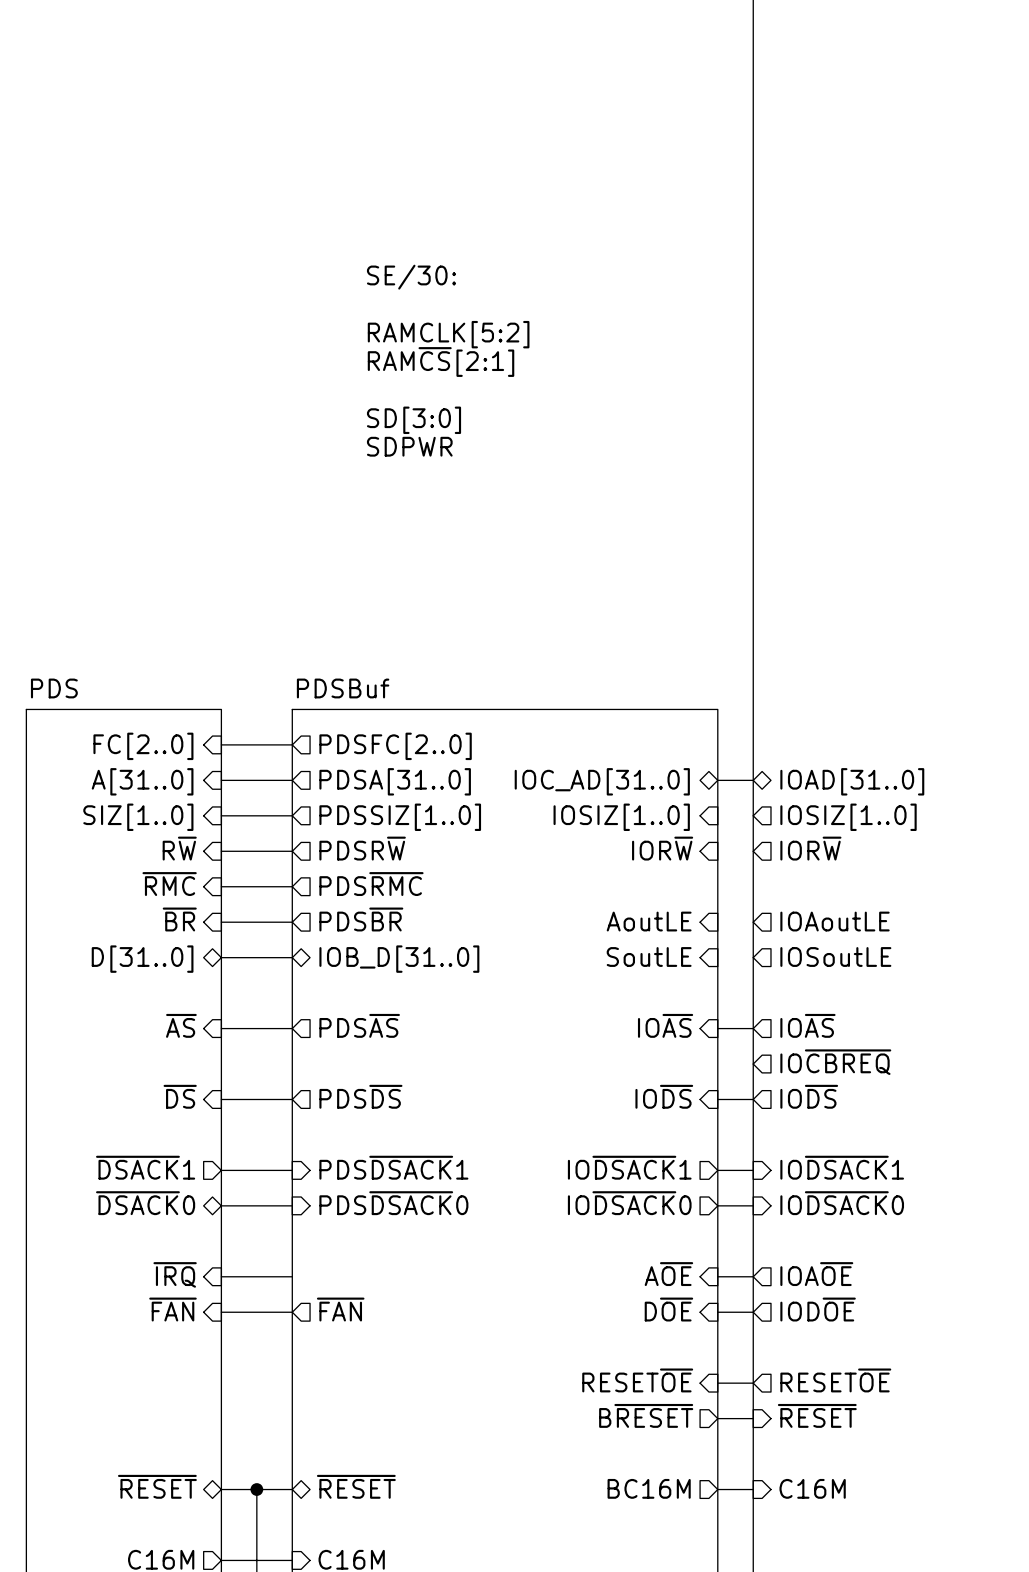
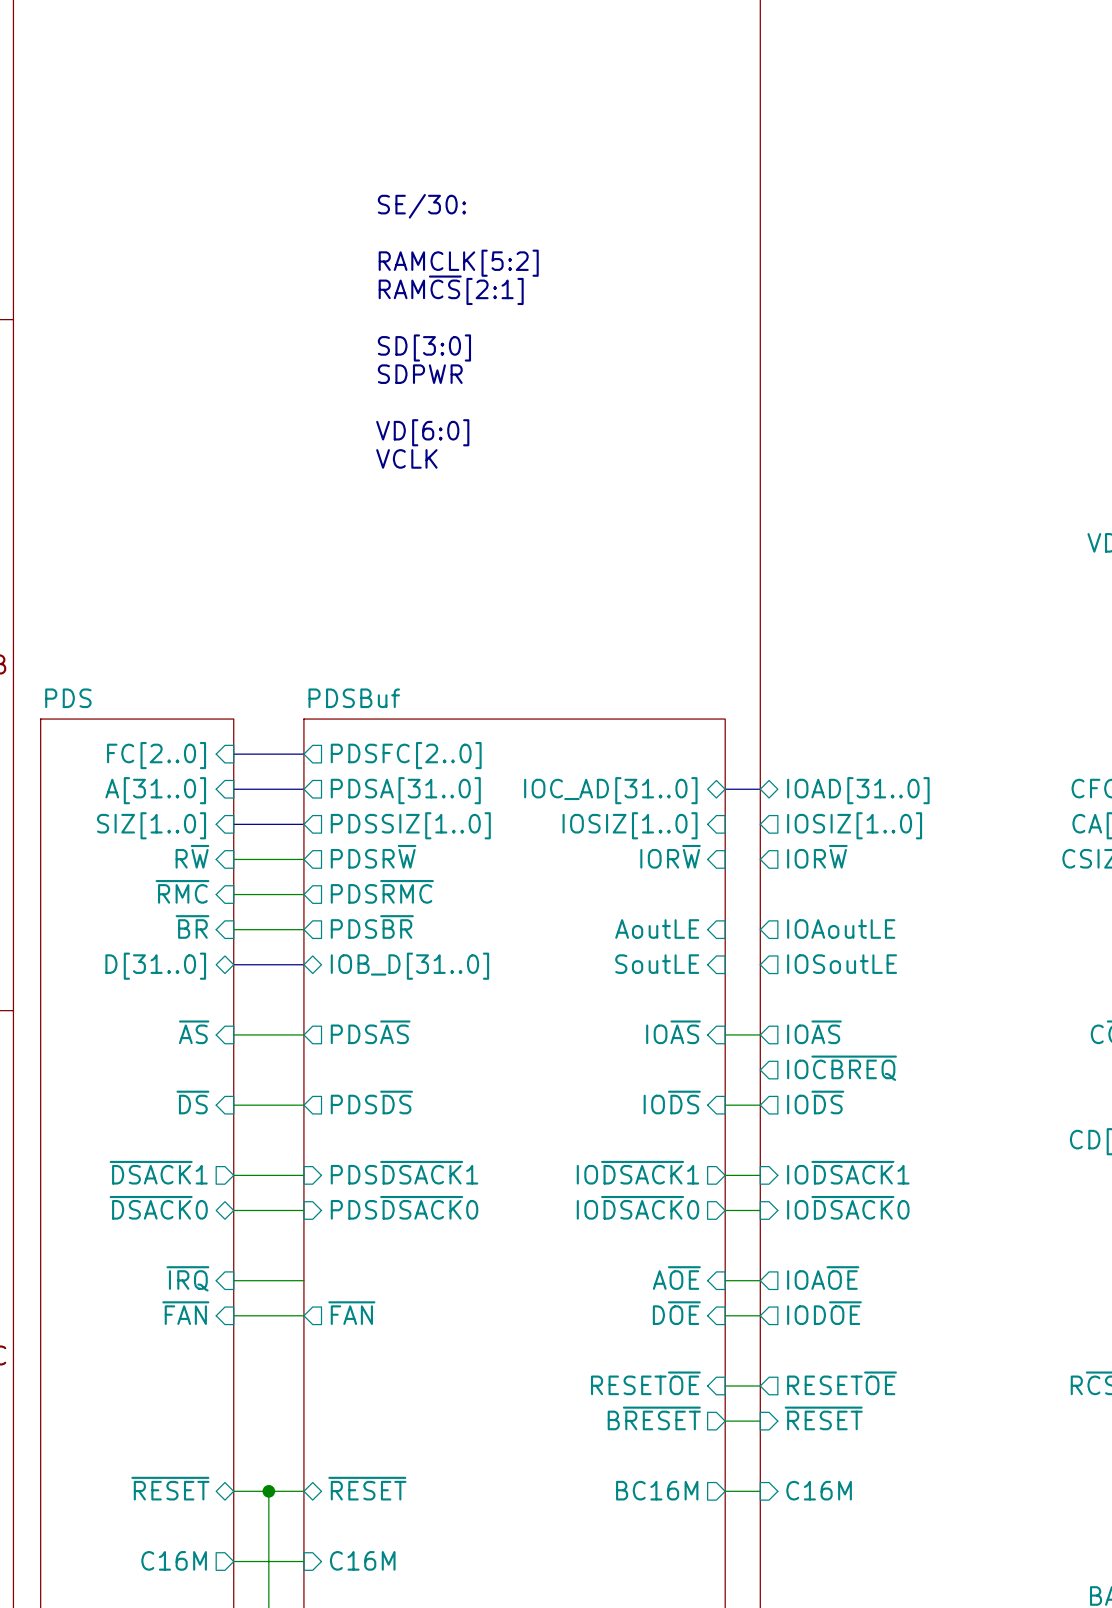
text: none -> SE/30: (421, 206)
text: none -> RAMCLK[5:2] (458, 263)
text: SE/30: (411, 277) -> RAM~{CS}[2:1] (451, 290)
text: RAMCLK[5:2] (448, 334) -> SD[3:0] (424, 347)
text: RAM~{CS}[2:1] (441, 362) -> SDPWR (420, 374)
text: SD[3:0] (414, 420) -> VD[6:0] (422, 432)
text: SDPWR (409, 446) -> VCLK (406, 458)

